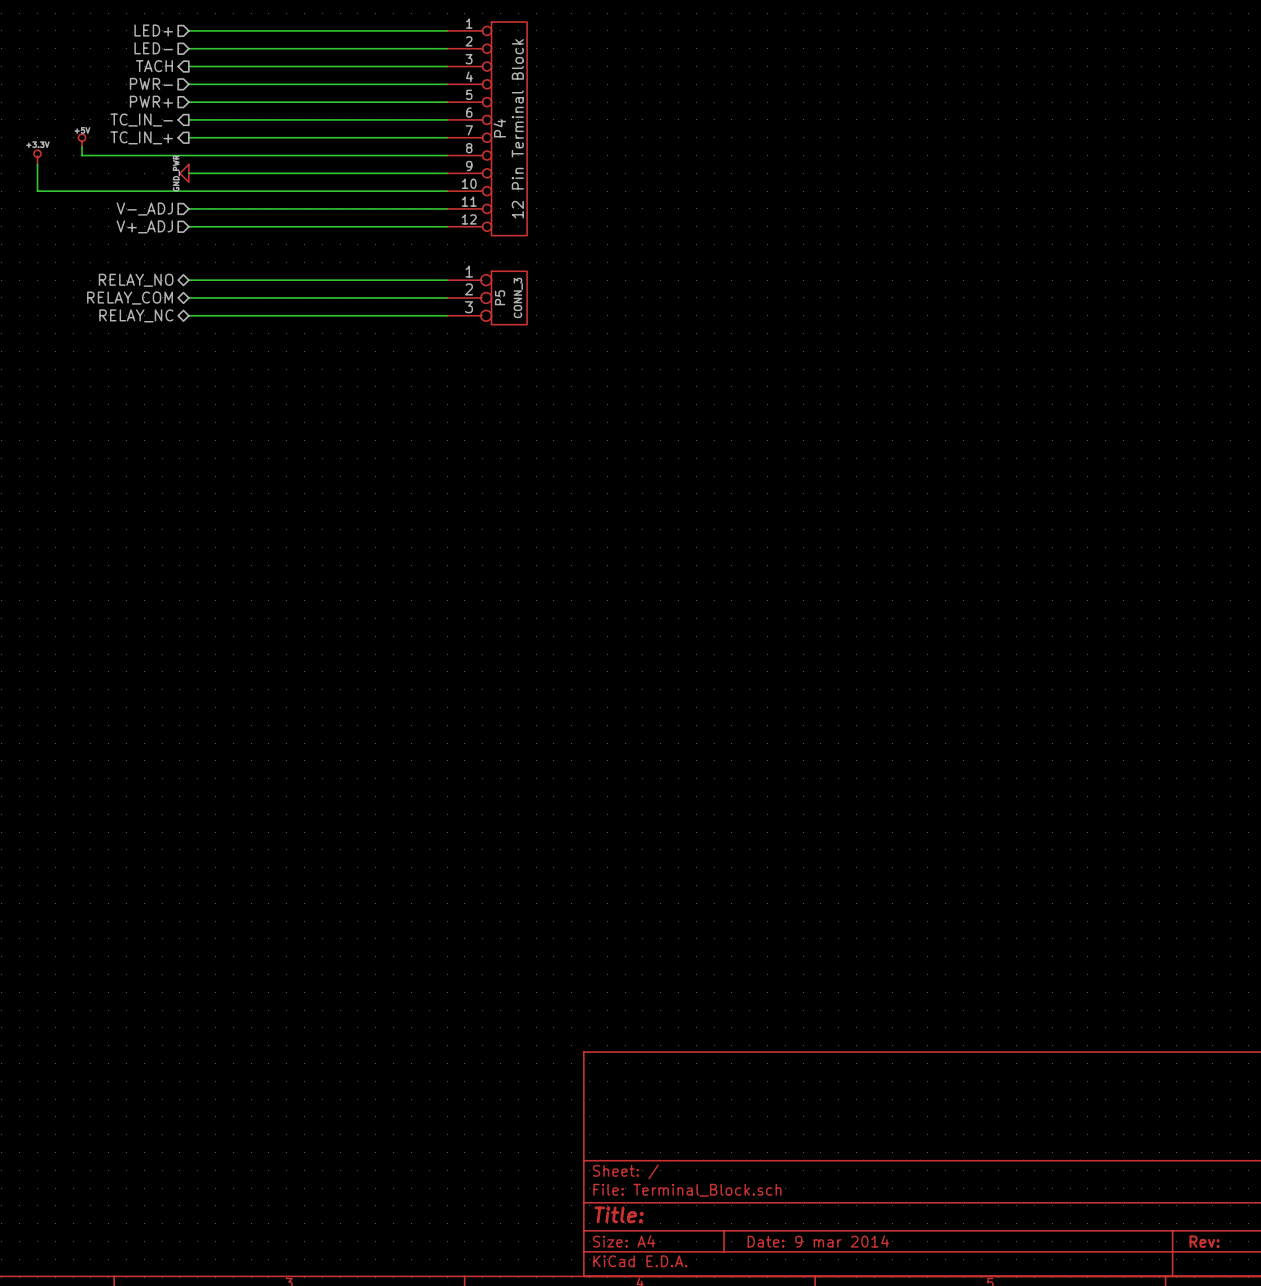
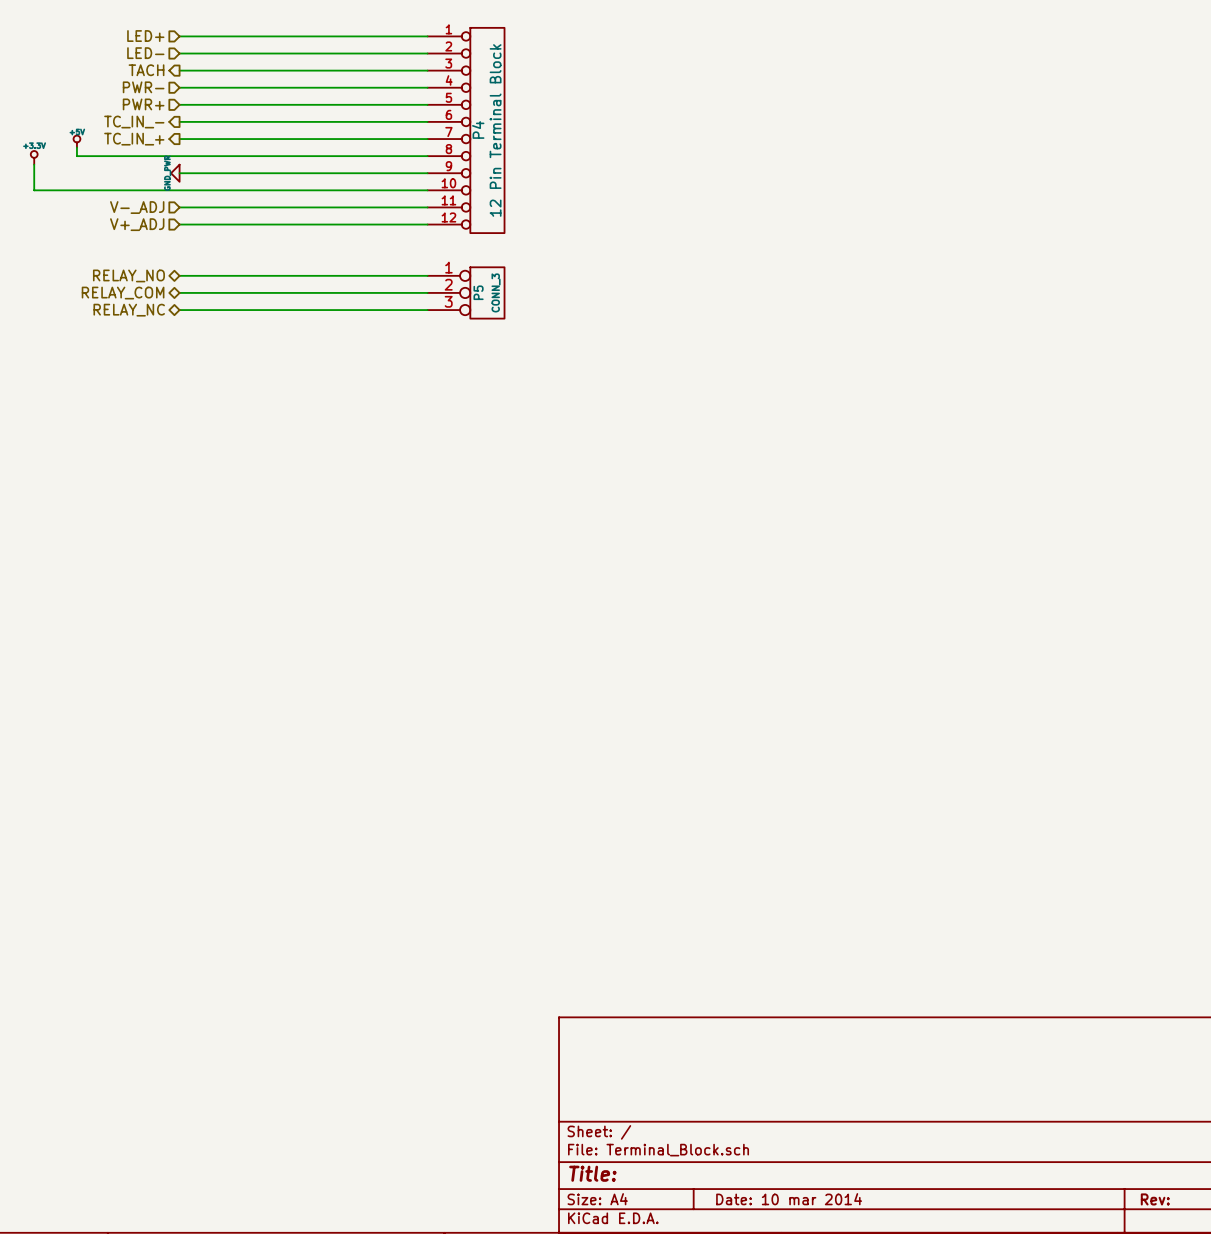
title block: Date: 9 mar 2014 (818, 1241) -> Date: 10 mar 2014 (789, 1199)

